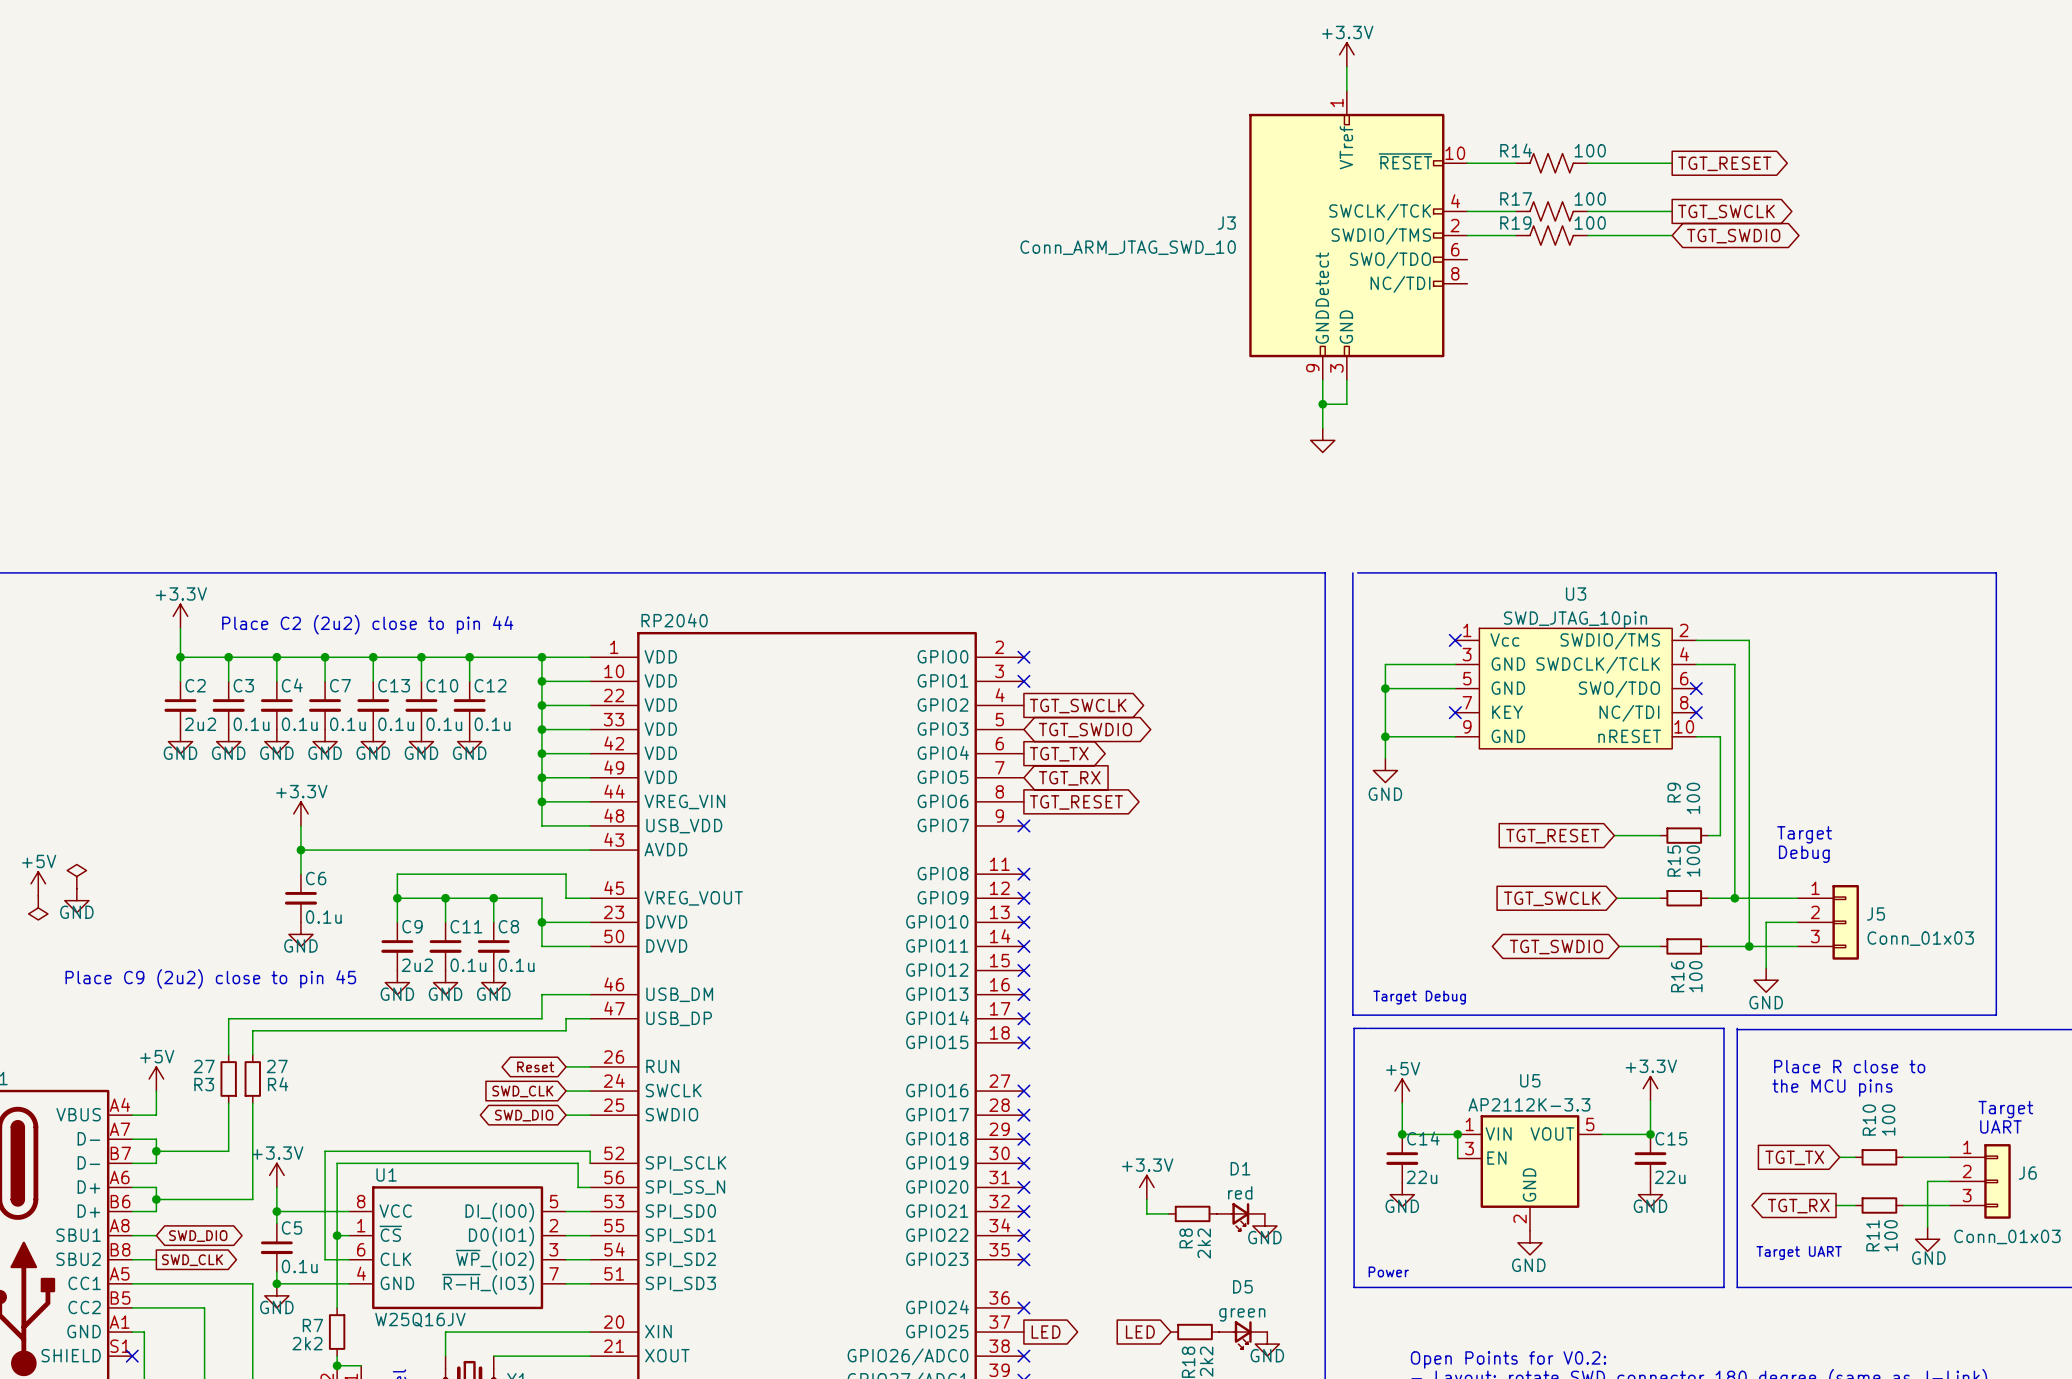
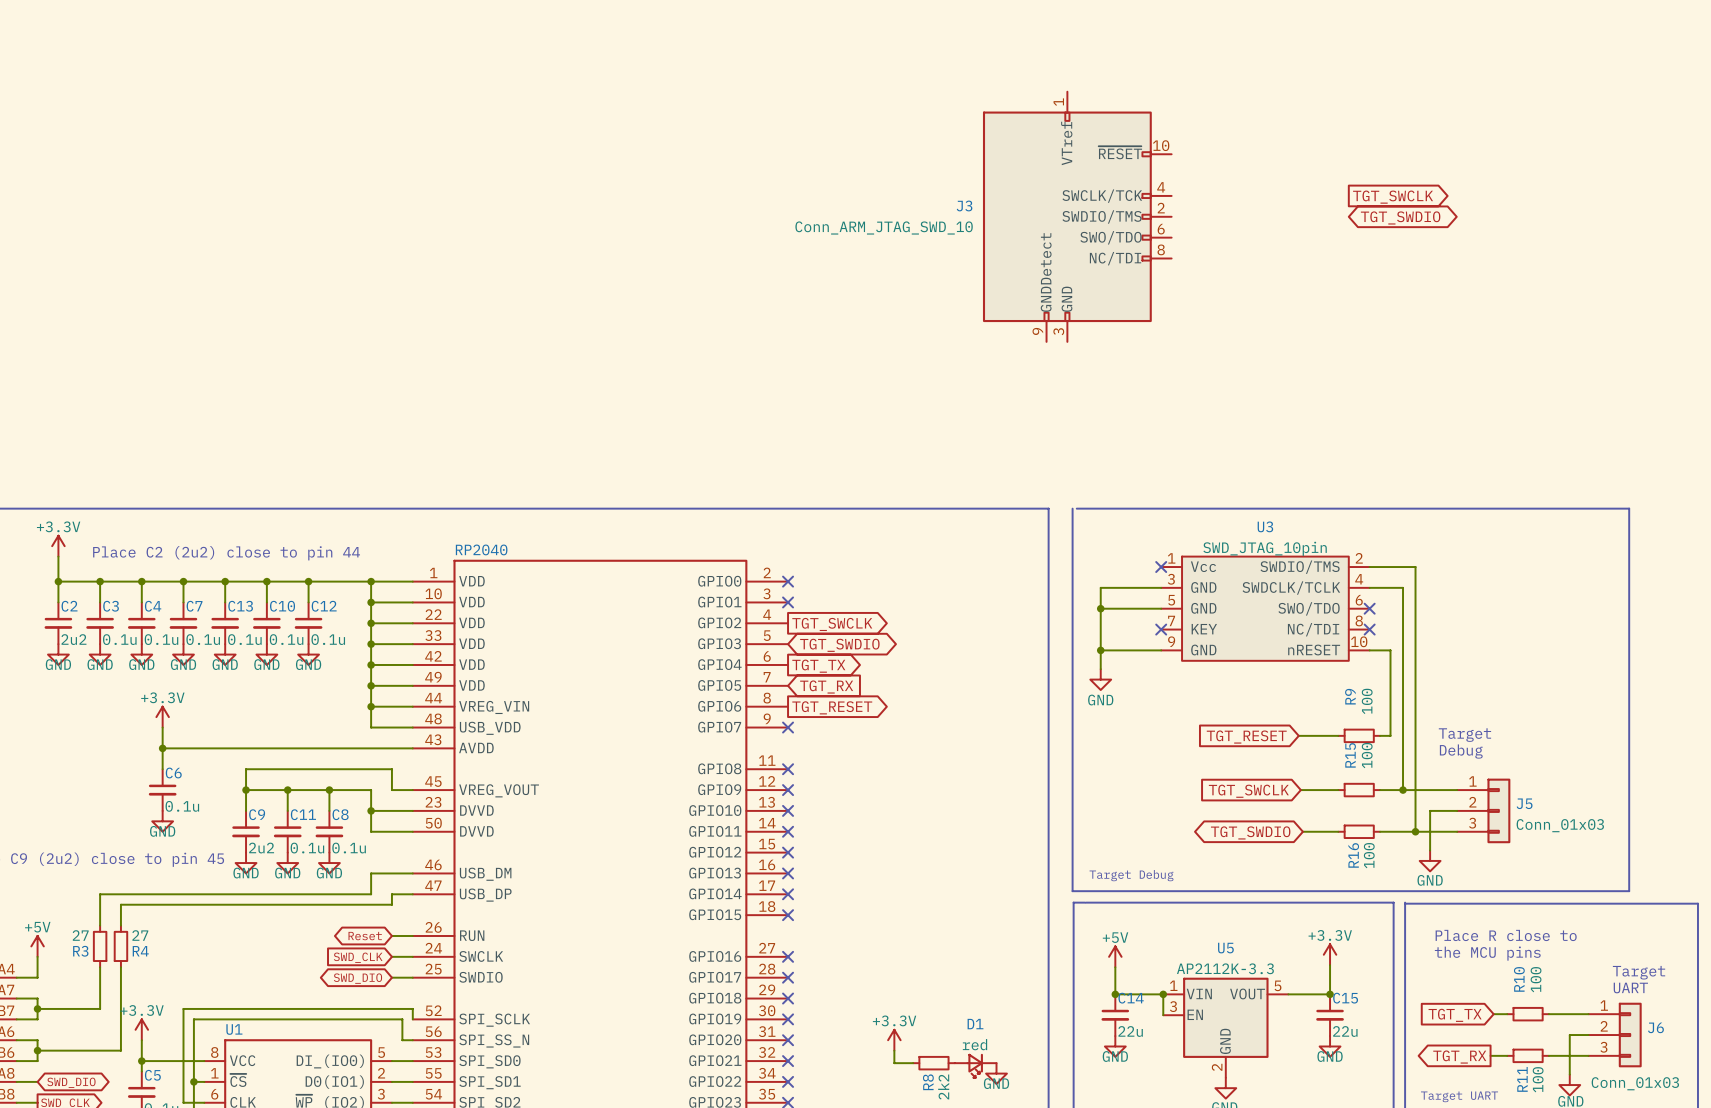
power symbol: +3.3V (1346, 54) -> none
wire: (1346, 66) (1346, 90) -> none
wire: (1467, 163) (1515, 163) -> none
R14: 100 (1551, 163) -> none
wire: (1587, 163) (1672, 163) -> none
global label: TGT_RESET (1724, 163) -> none
wire: (1467, 211) (1515, 211) -> none
R17: 100 (1551, 211) -> none
wire: (1587, 211) (1672, 211) -> none
wire: (1467, 235) (1515, 235) -> none
R19: 100 (1551, 235) -> none
wire: (1587, 235) (1672, 235) -> none
wire: (1322, 380) (1322, 428) -> none
wire: (1346, 380) (1346, 404) (1322, 404) -> none
junction: (1322, 404) -> none
power symbol: (1322, 440) -> none

